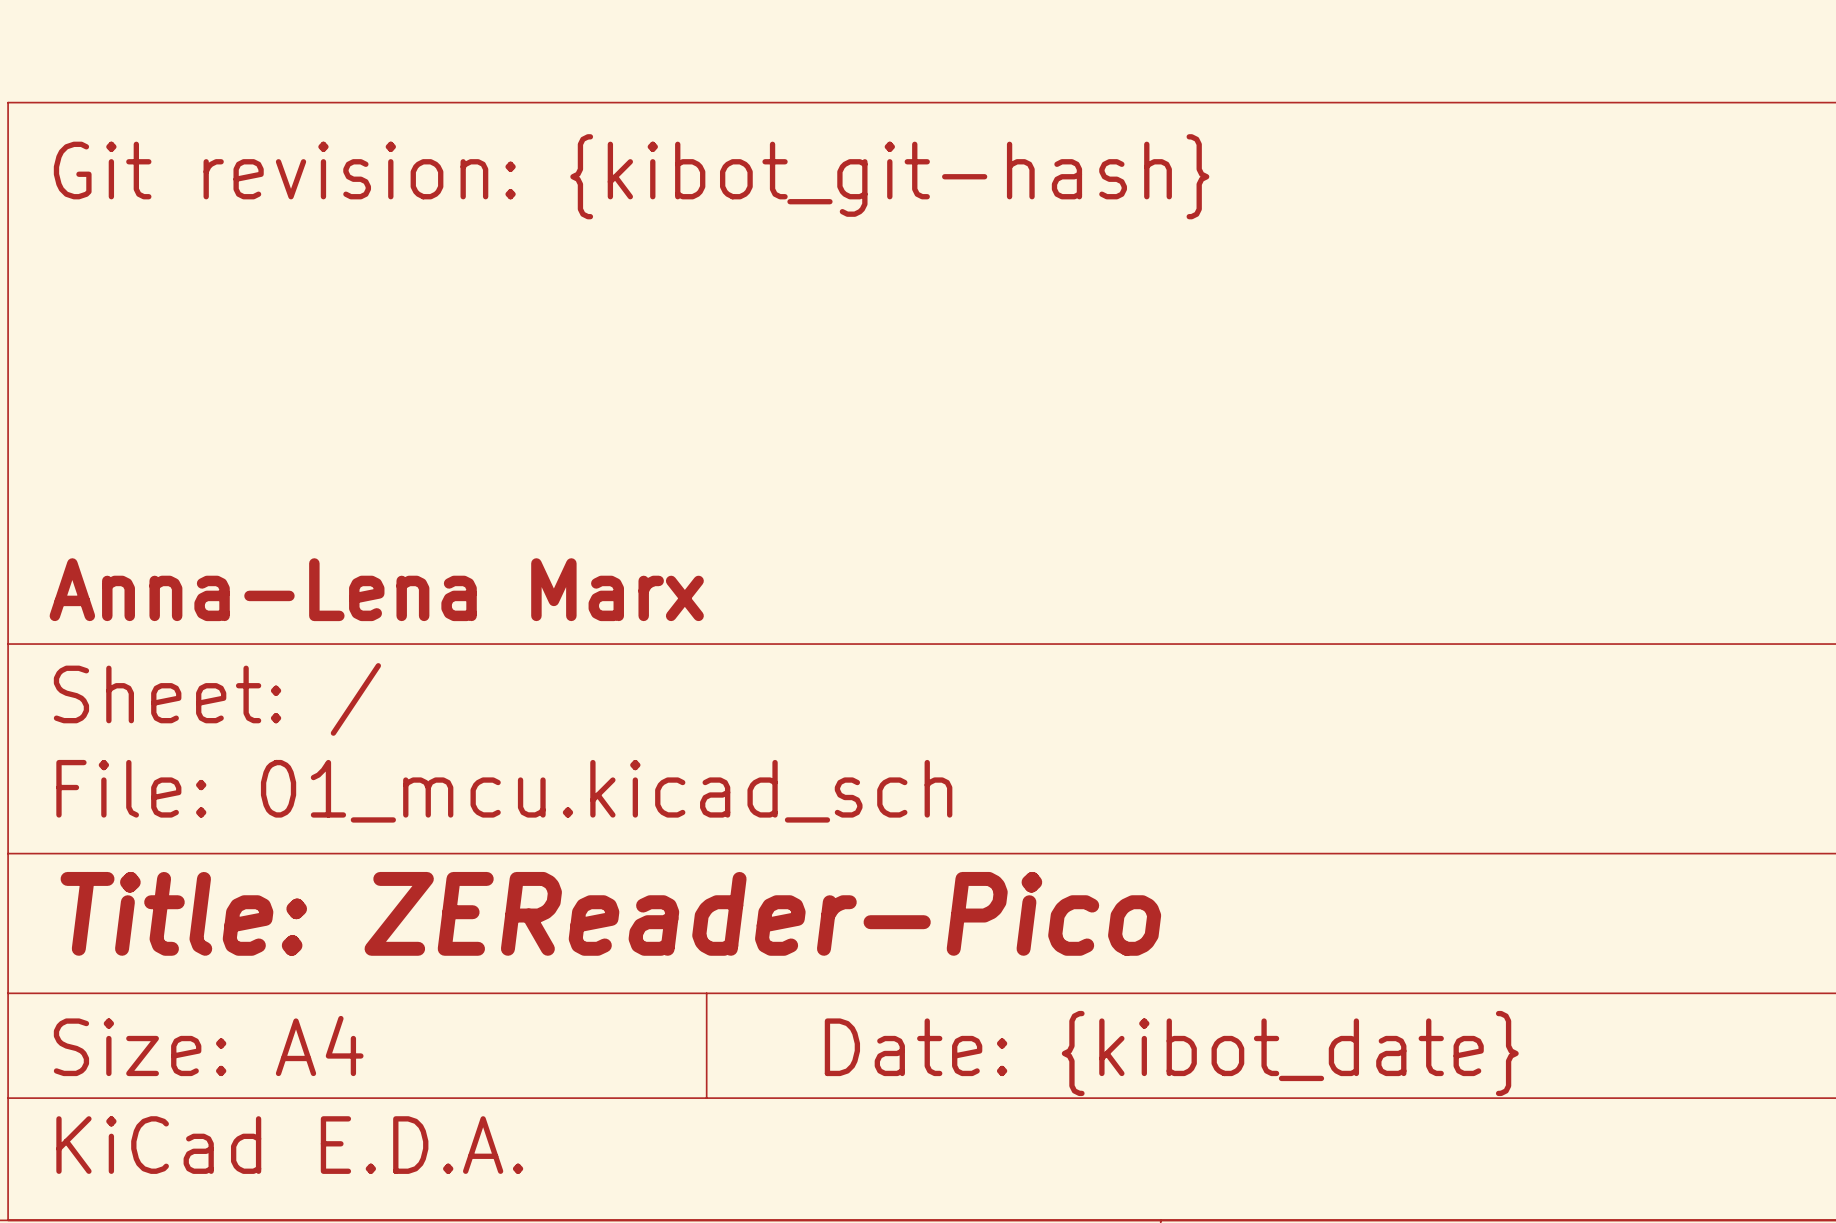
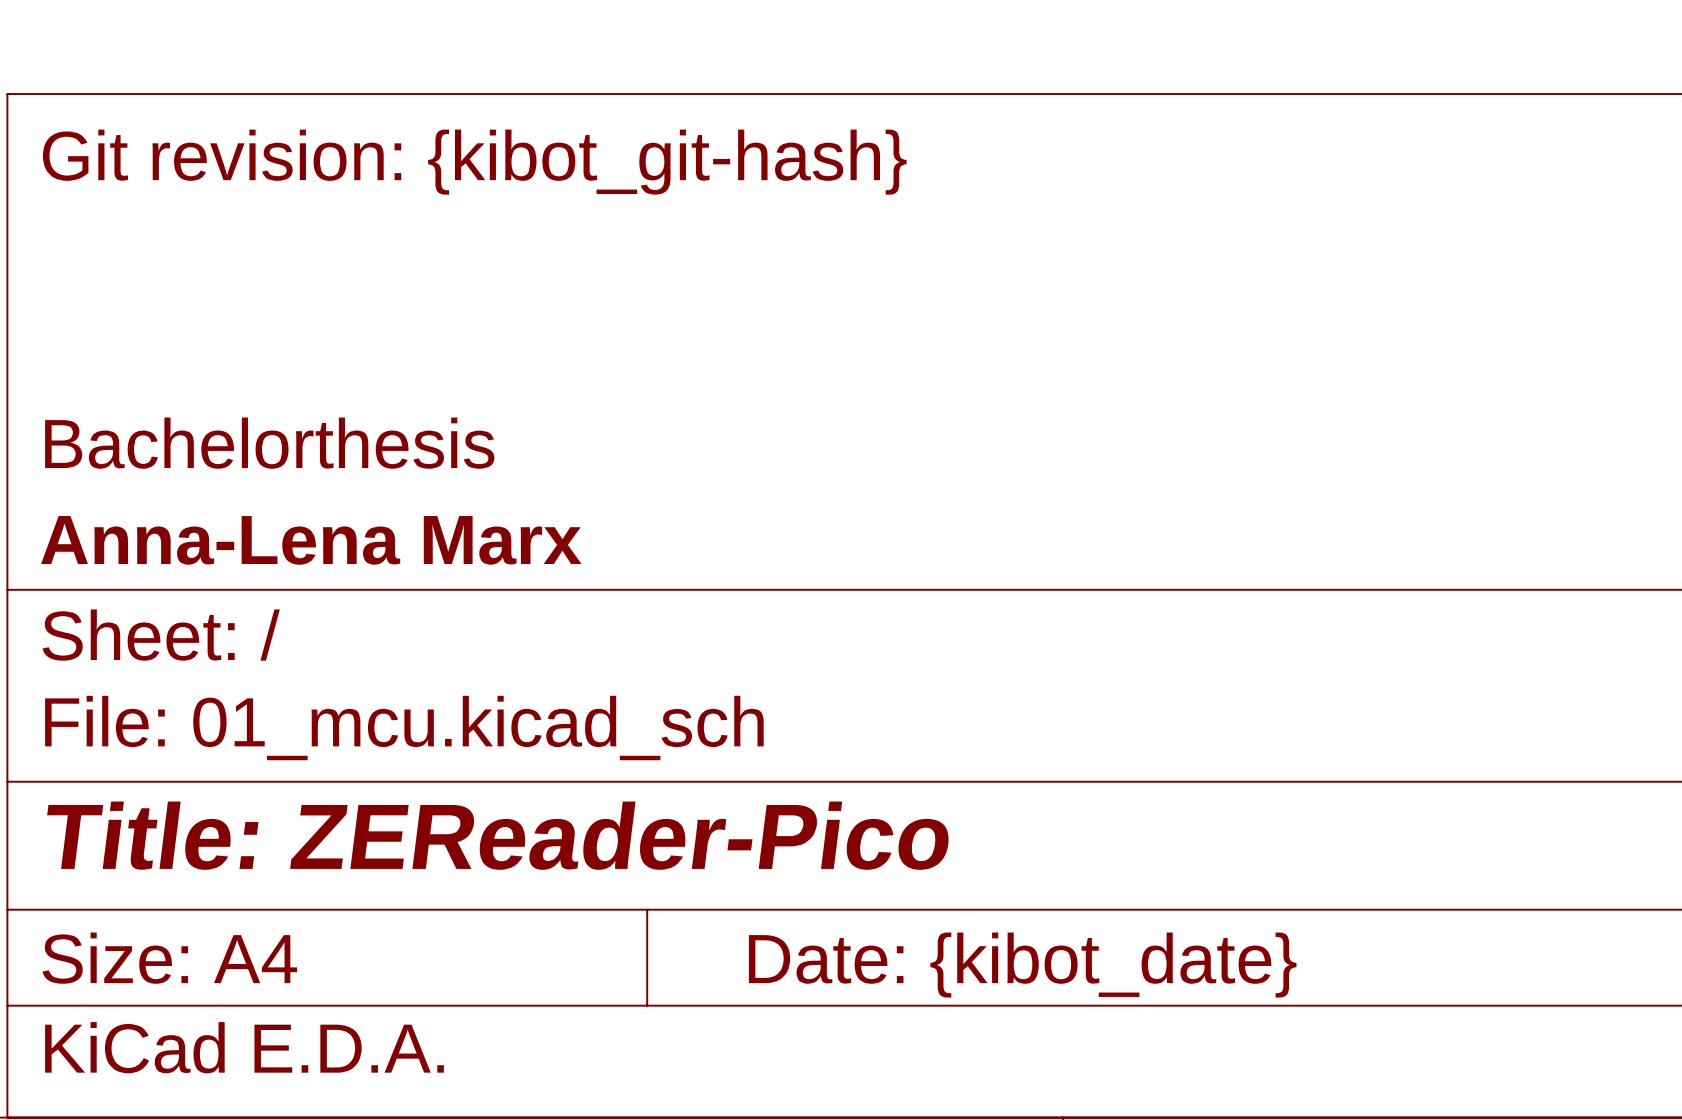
title block: none -> Bachelorthesis (269, 443)

